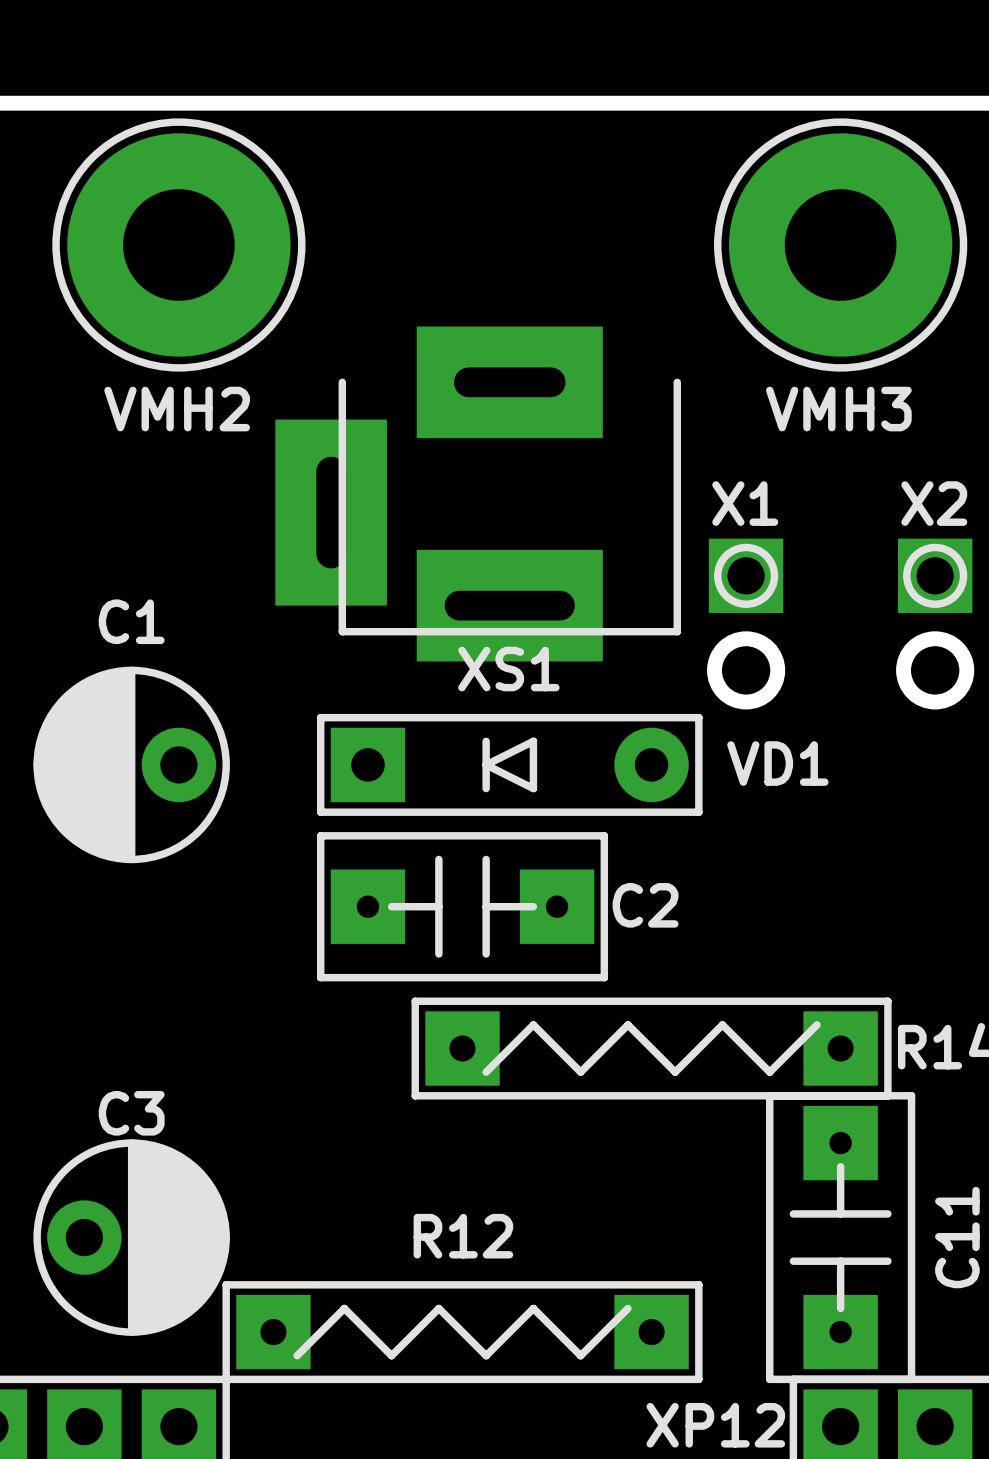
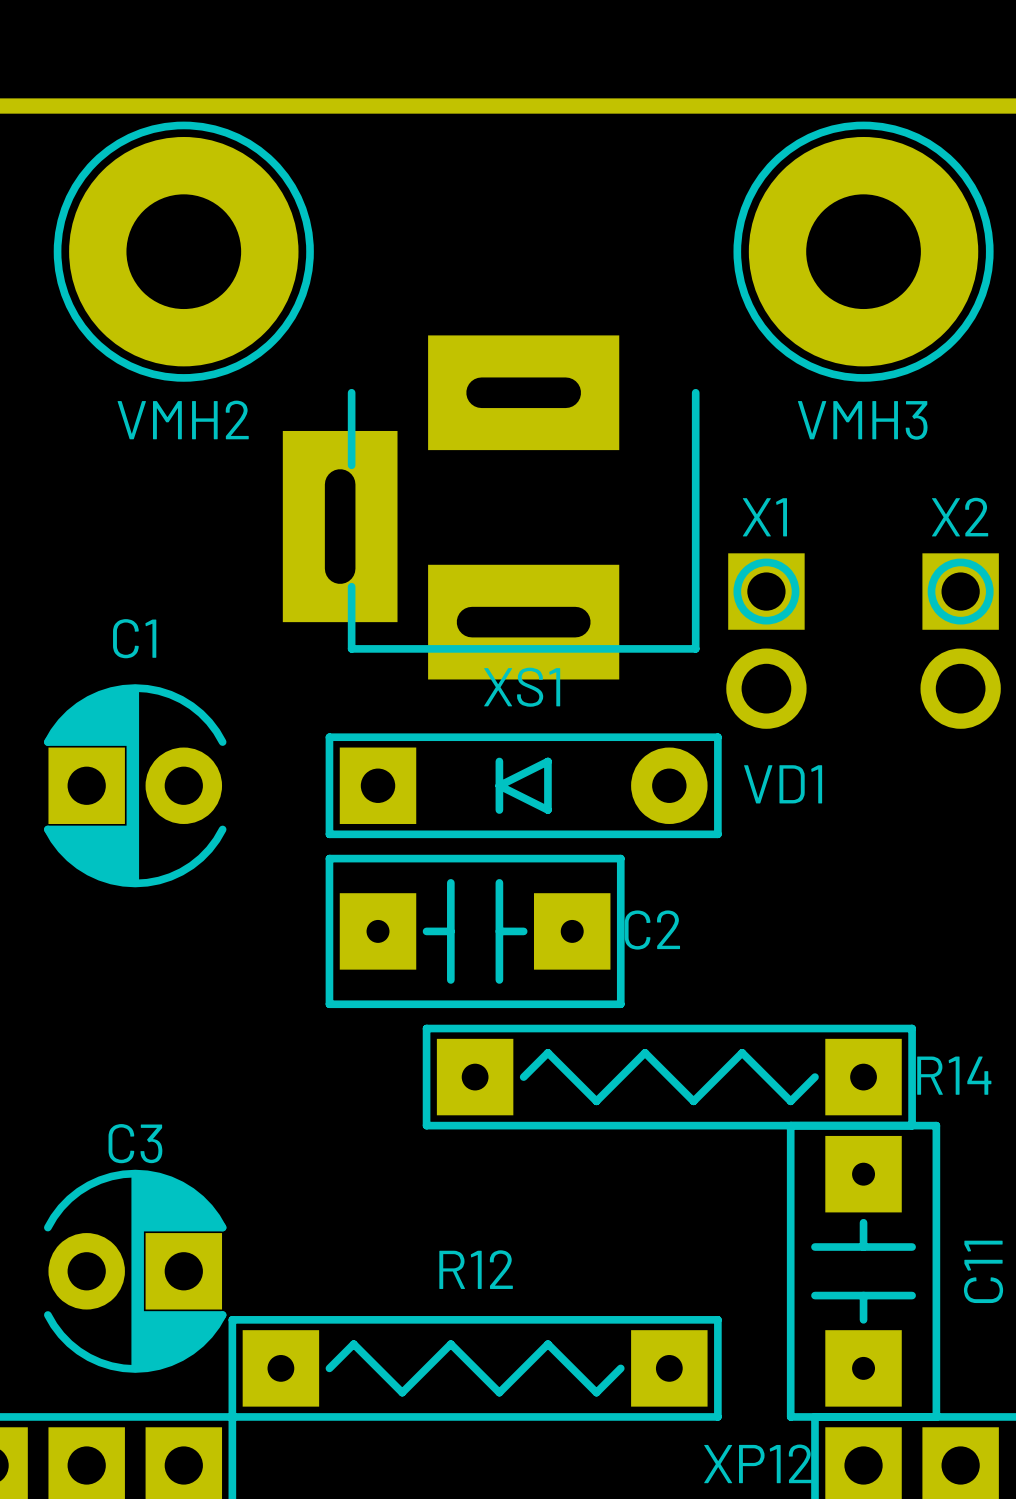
XS1 footprint: [275, 326, 681, 662] -> [282, 335, 700, 680]
C1 footprint: [33, 666, 230, 864] -> [44, 684, 227, 888]
C2 footprint: [317, 832, 609, 982] -> [325, 854, 625, 1009]
R14 footprint: [411, 997, 892, 1100] -> [422, 1024, 916, 1130]
C11 footprint: [766, 1092, 916, 1384] -> [786, 1121, 941, 1421]
C3 footprint: [33, 1139, 230, 1336] -> [44, 1169, 227, 1373]
R12 footprint: [222, 1281, 703, 1384] -> [228, 1316, 722, 1421]

